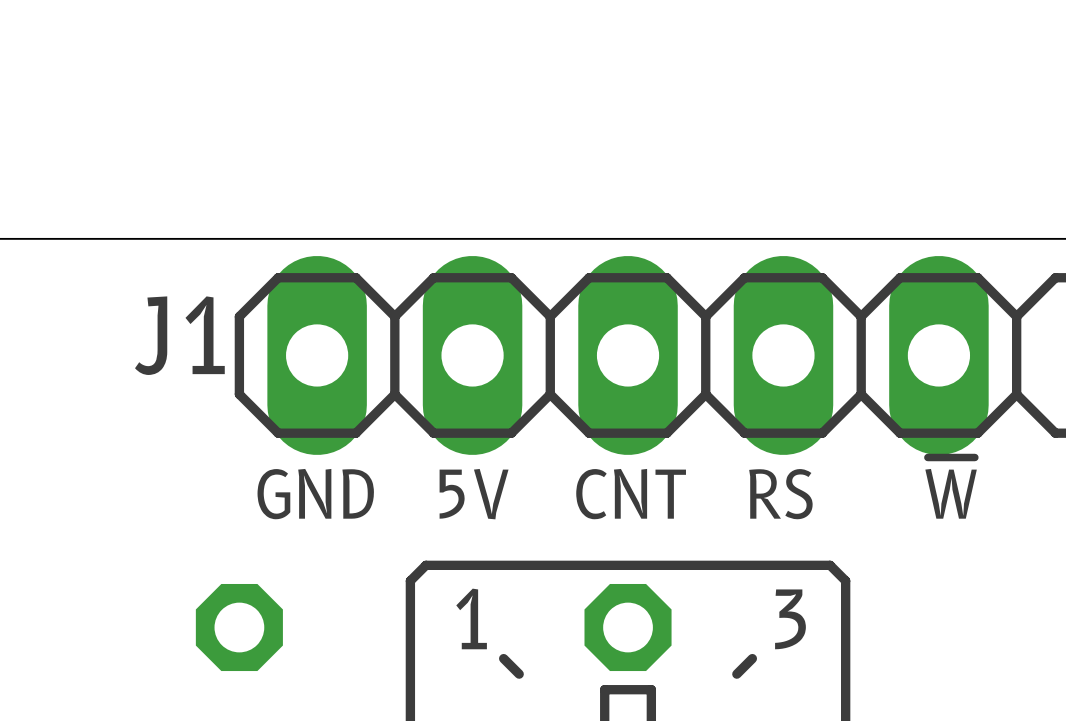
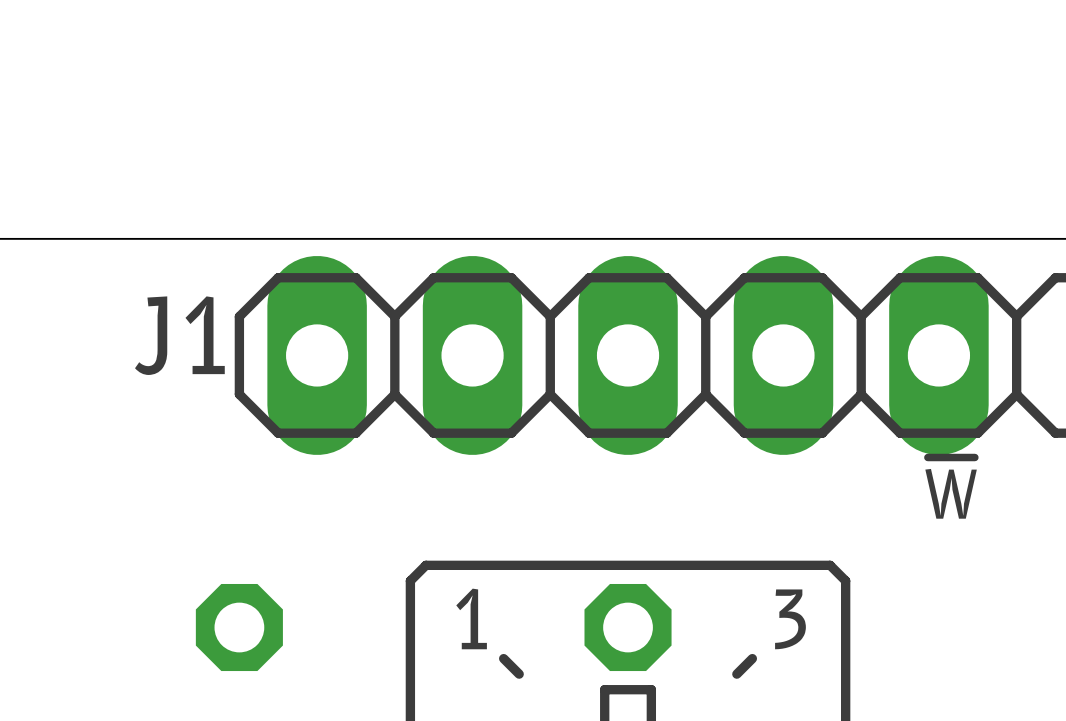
text: GND (315, 494) -> none
text: 5V (474, 494) -> none
text: CNT (631, 494) -> none
text: RS (780, 494) -> none

